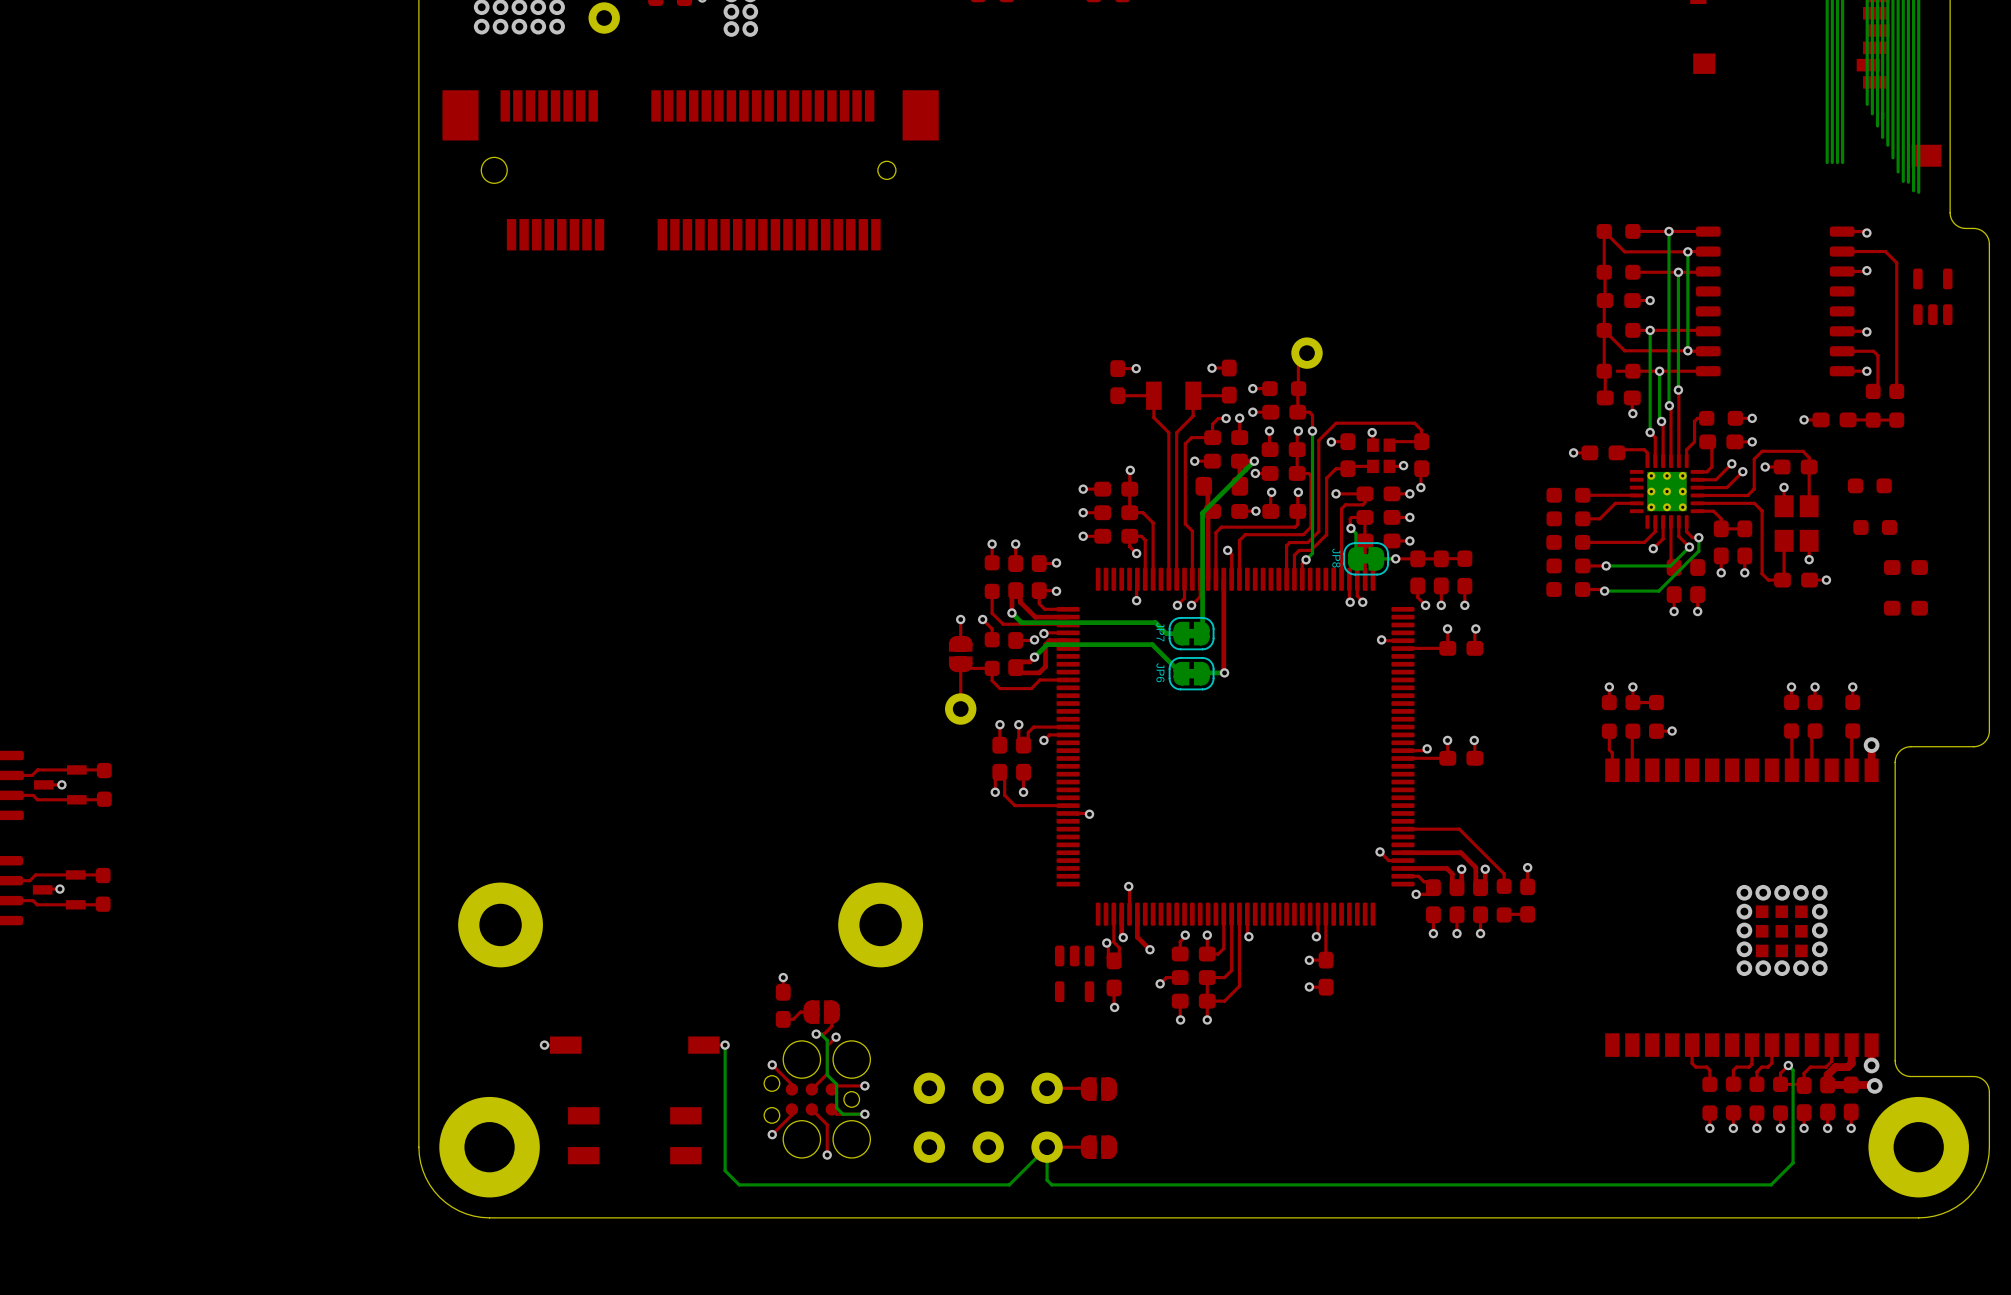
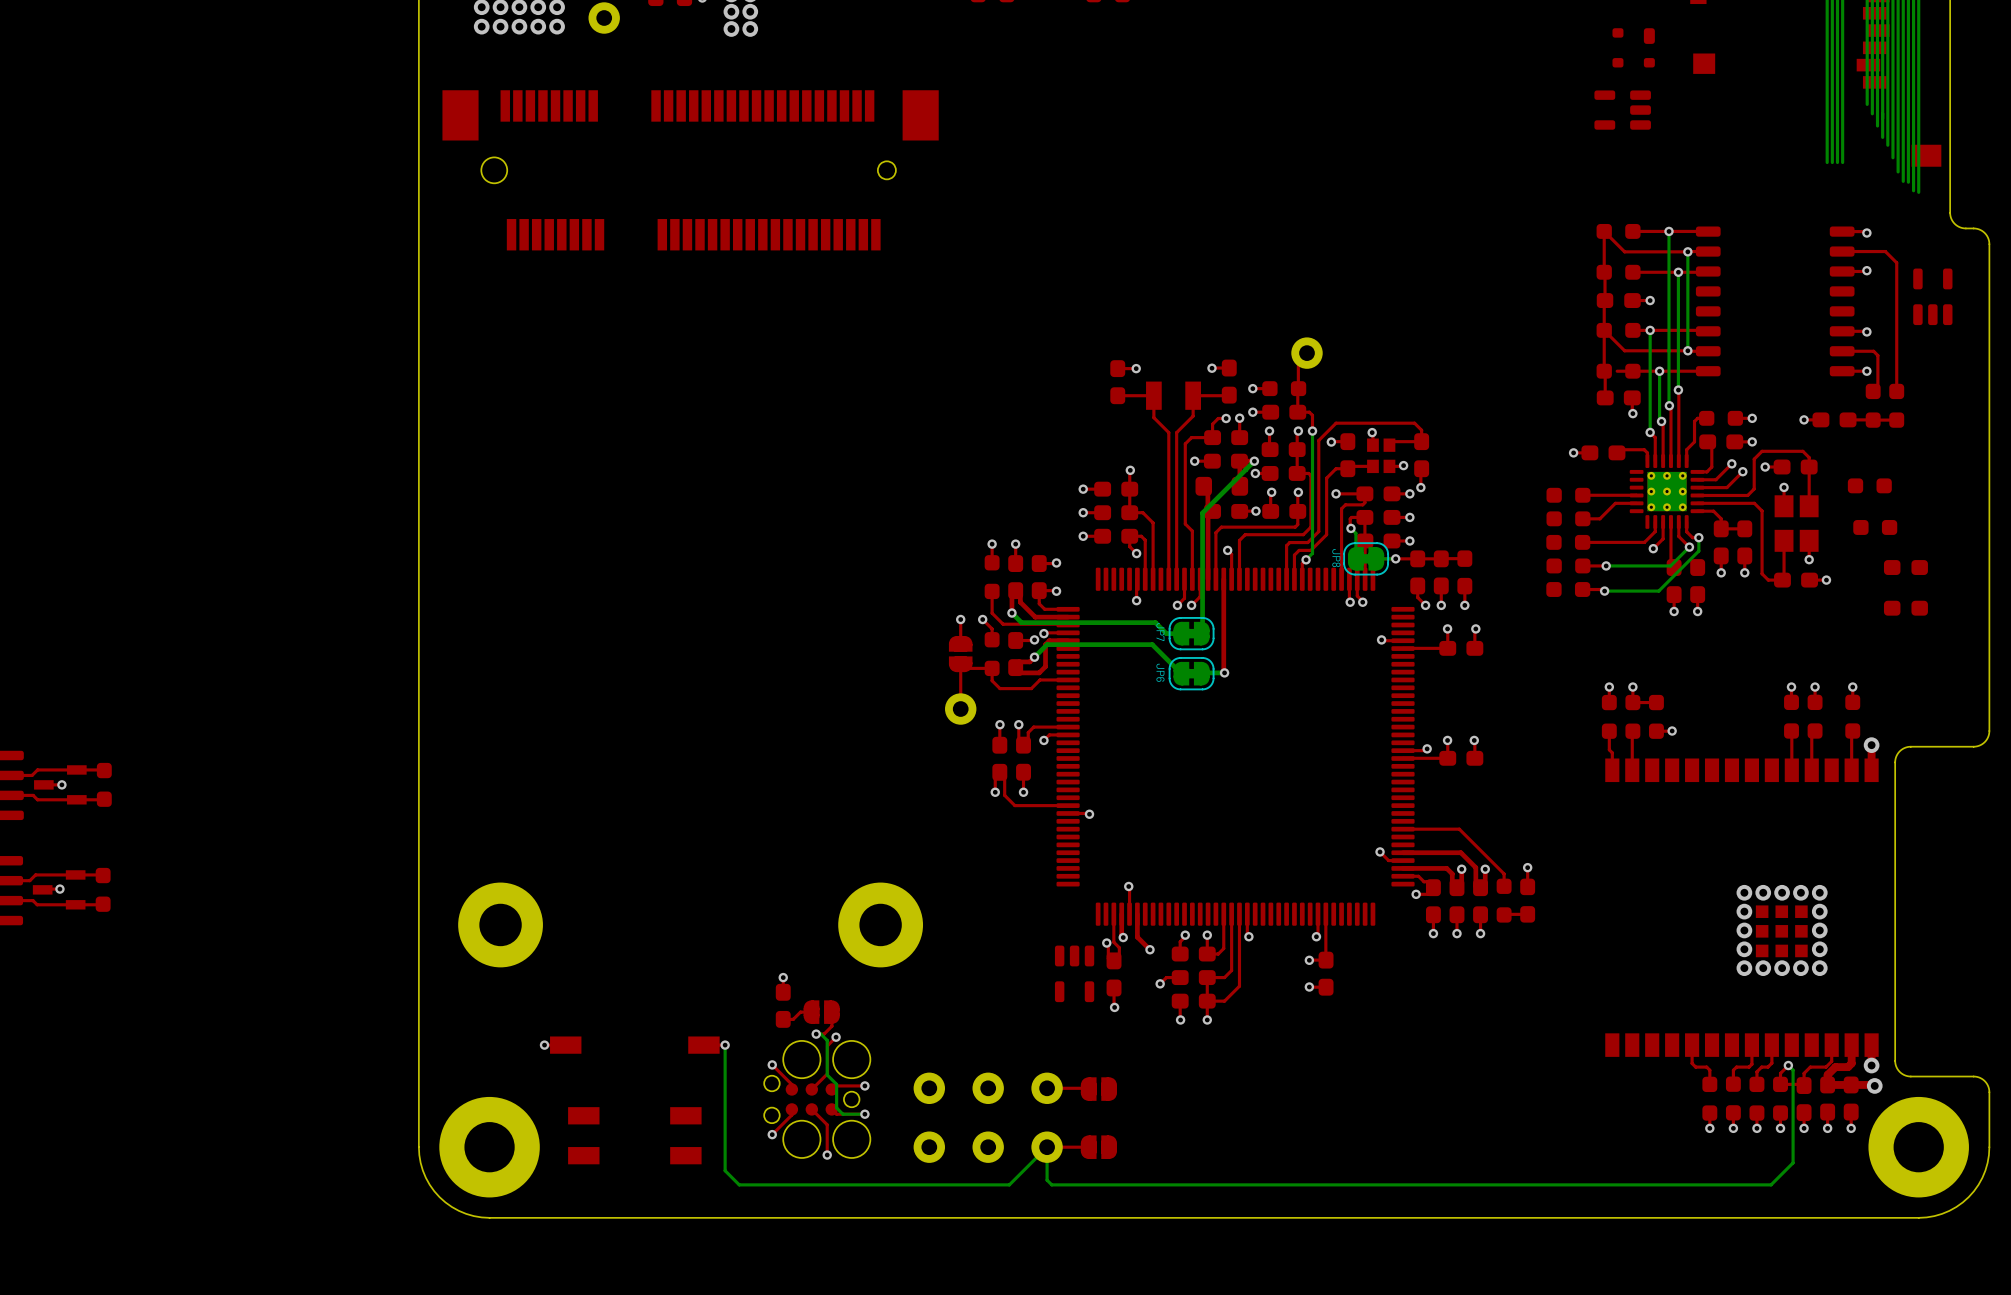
part: none -> (1633, 47)
part: none -> (1622, 110)

